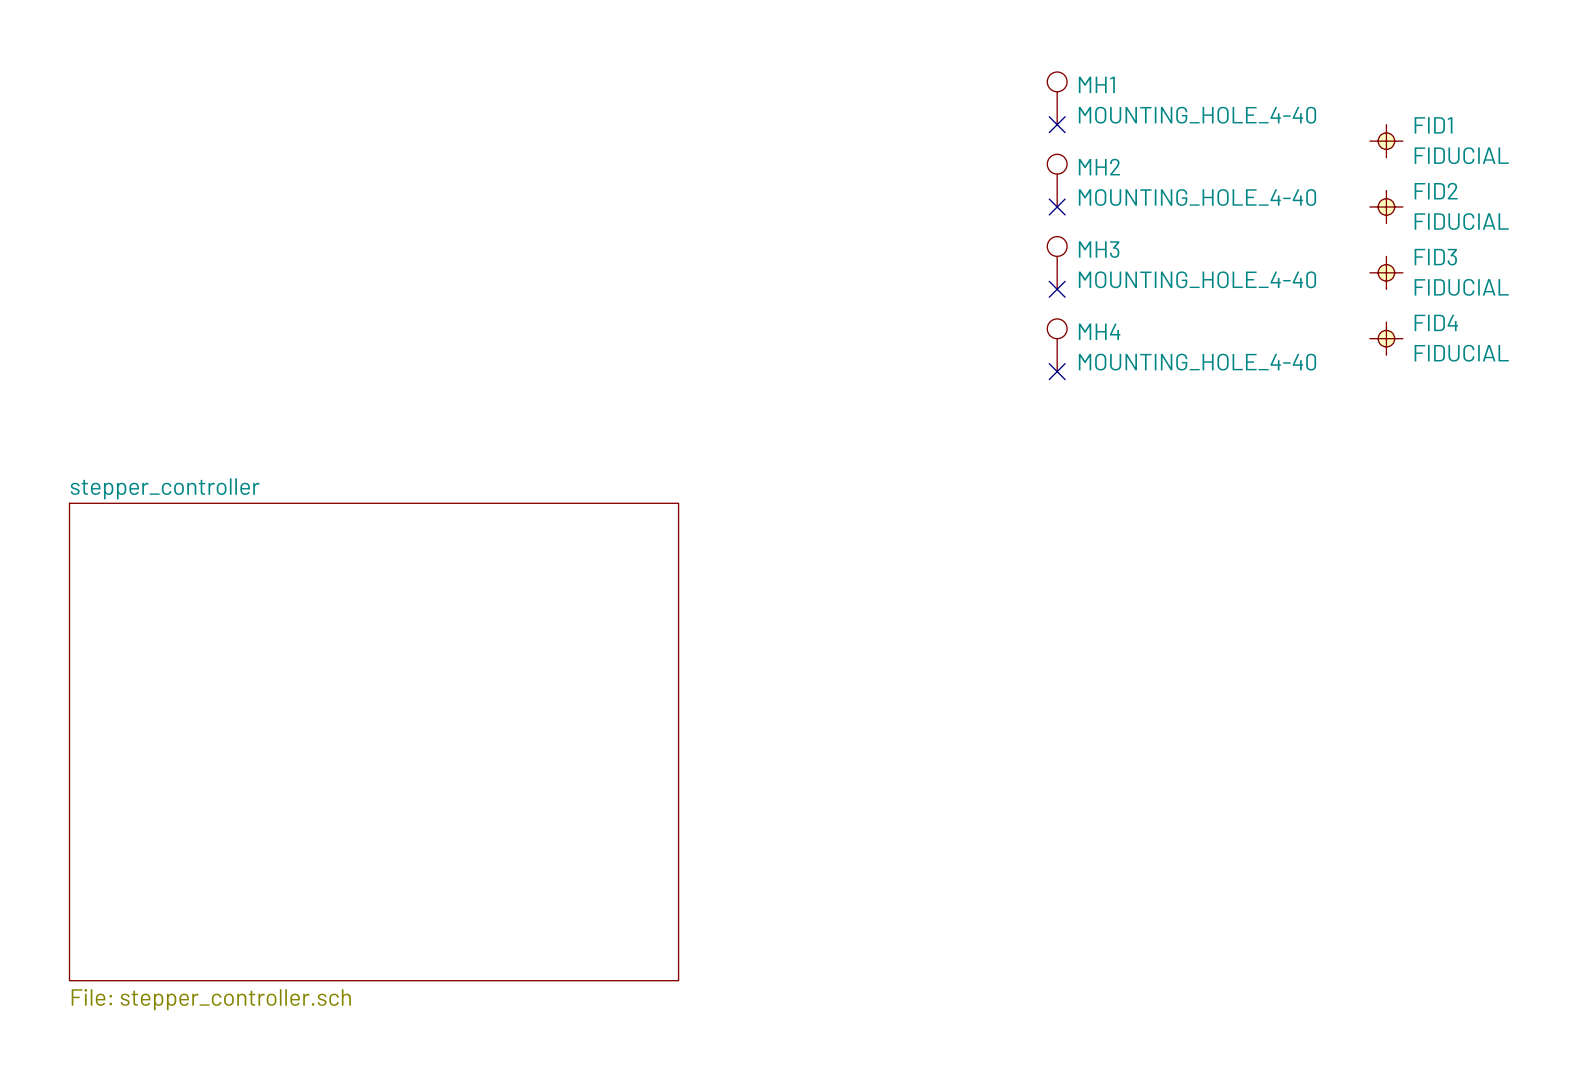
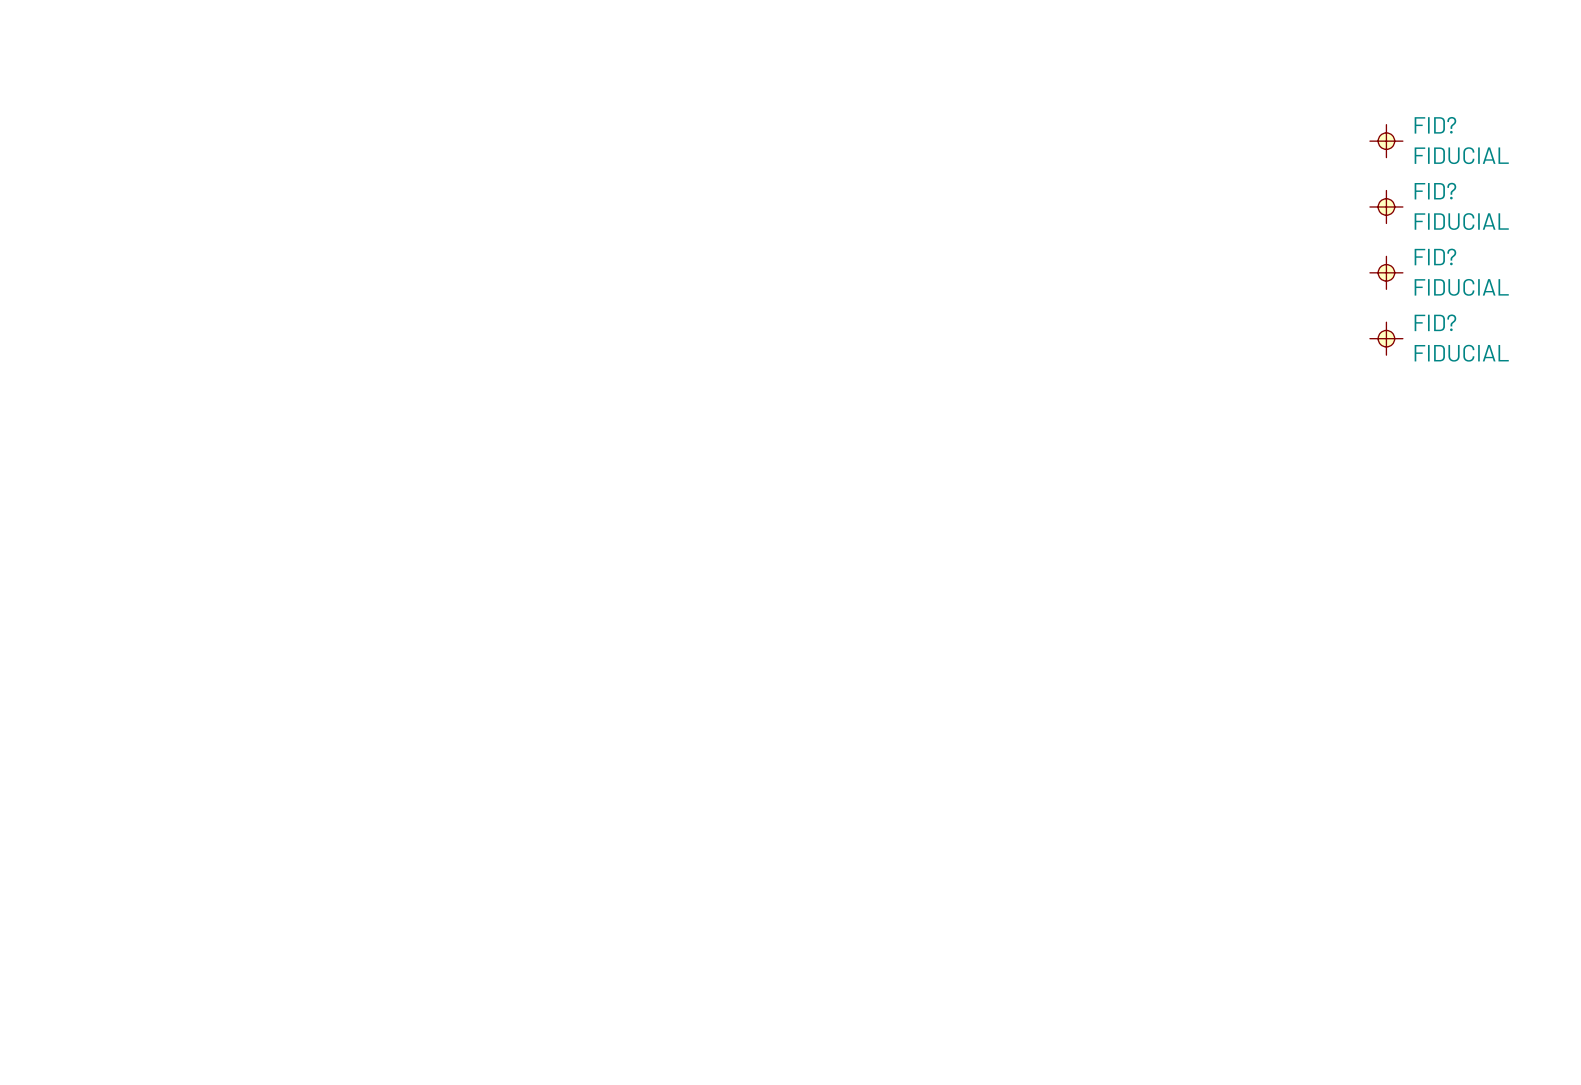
MH1: MOUNTING_HOLE_4-40 (1057, 98) -> none
no-connect mark: (1057, 124) -> none
FID1 name: FID1 (1433, 125) -> FID? (1435, 125)
MH2: MOUNTING_HOLE_4-40 (1057, 180) -> none
FID2 name: FID2 (1436, 191) -> FID? (1435, 191)
no-connect mark: (1057, 206) -> none
FID3 name: FID3 (1435, 257) -> FID? (1435, 256)
MH3: MOUNTING_HOLE_4-40 (1057, 262) -> none
no-connect mark: (1057, 289) -> none
FID4 name: FID4 (1436, 322) -> FID? (1435, 322)
MH4: MOUNTING_HOLE_4-40 (1057, 345) -> none
no-connect mark: (1057, 371) -> none
sheet stepper_controller: File: stepper_controller.sch (374, 741) -> none

